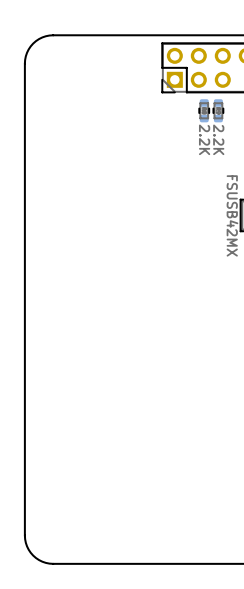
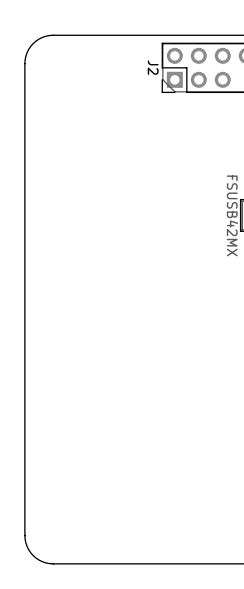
J2 name: none -> J2 (153, 67)
part: 2.2K (204, 110) -> none
part: 2.2K (218, 110) -> none

